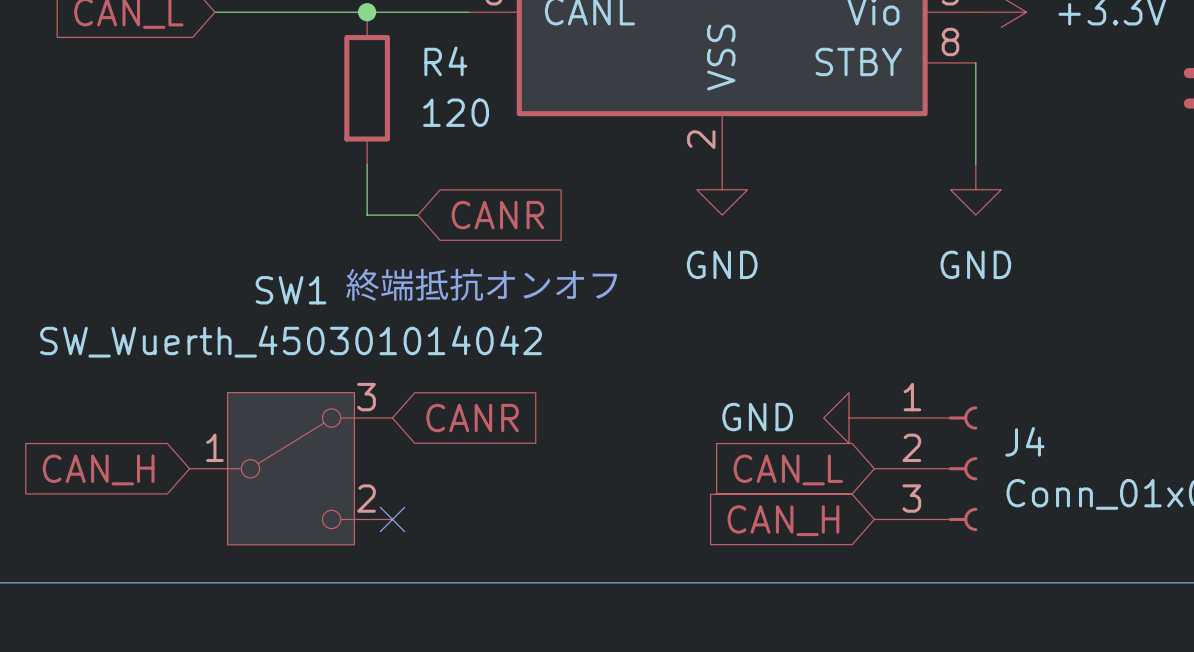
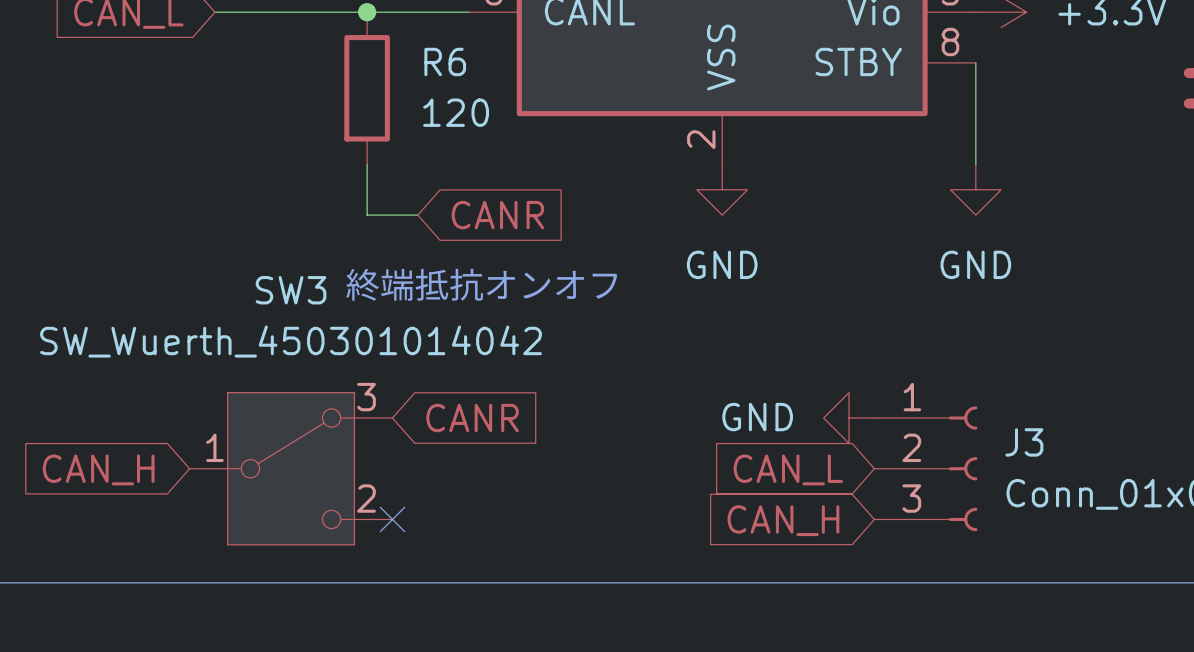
R4 name: R4 (445, 61) -> R6 (445, 61)
SW1 name: SW1 (291, 290) -> SW3 (291, 290)
J4 name: J4 (1024, 441) -> J3 (1024, 442)

